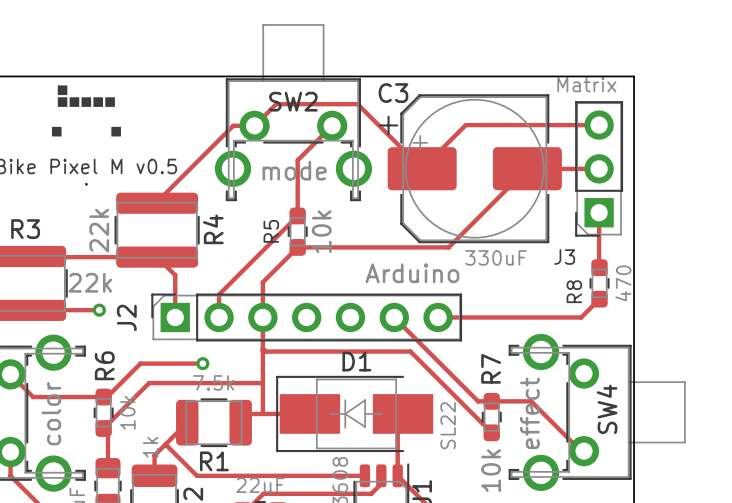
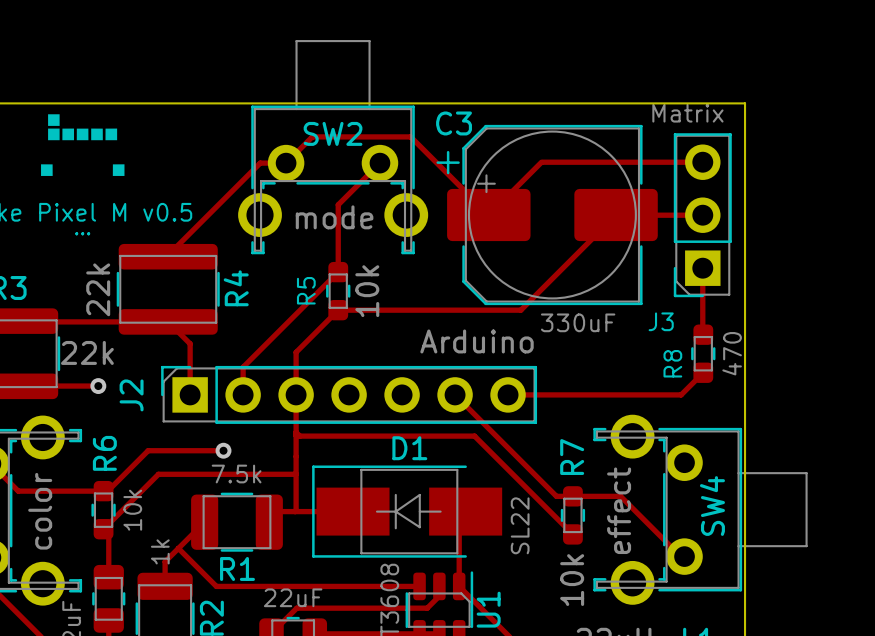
part name: . (86, 184) -> ... (82, 233)

